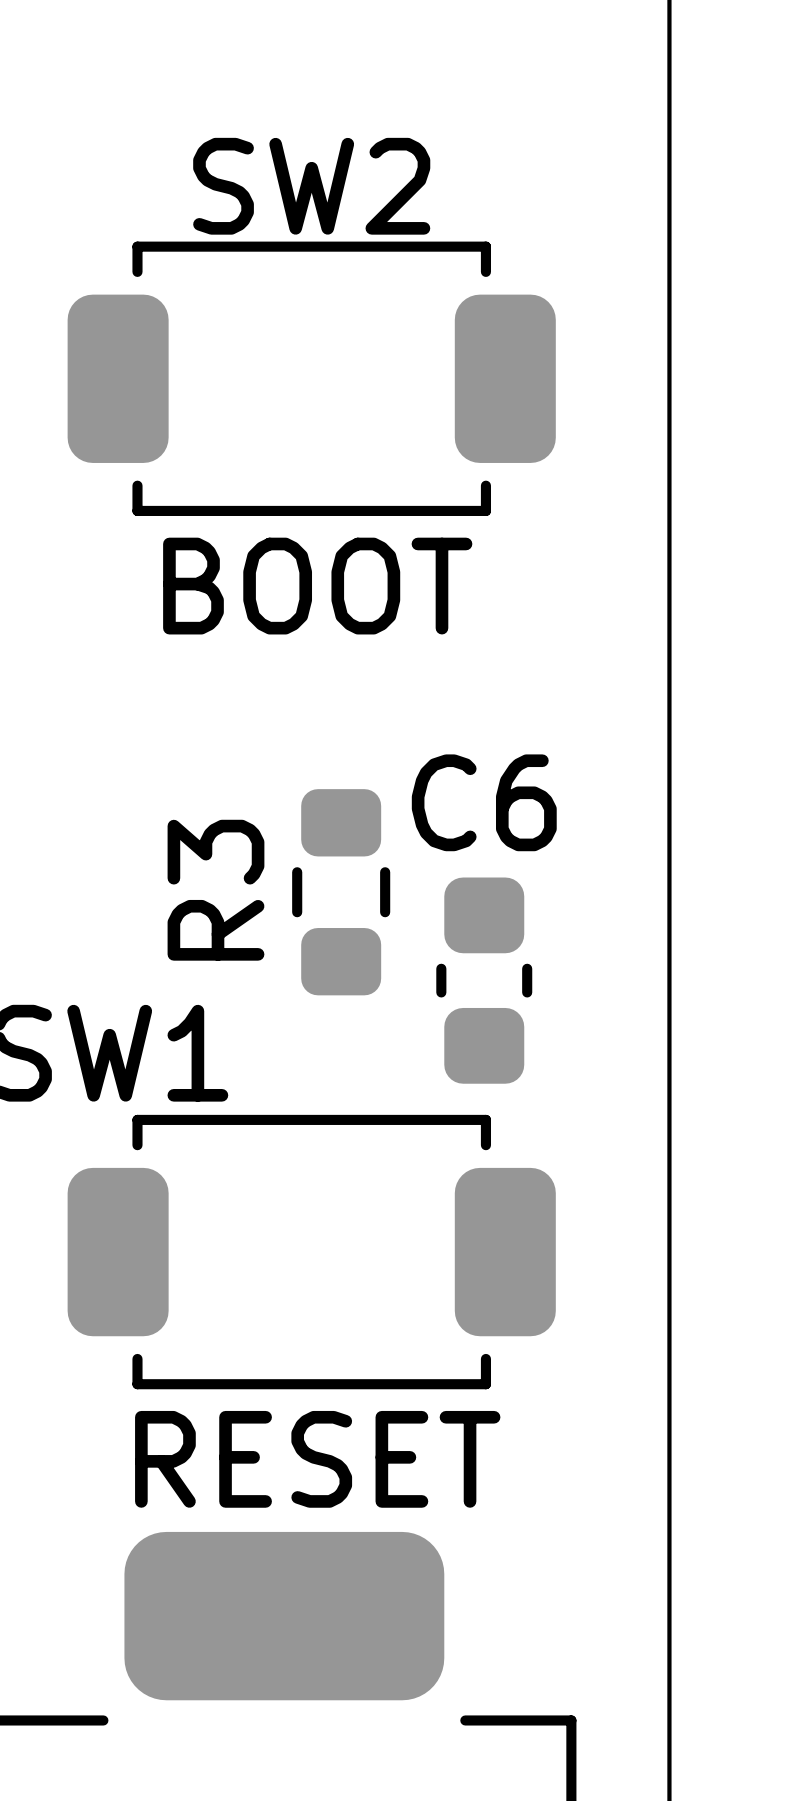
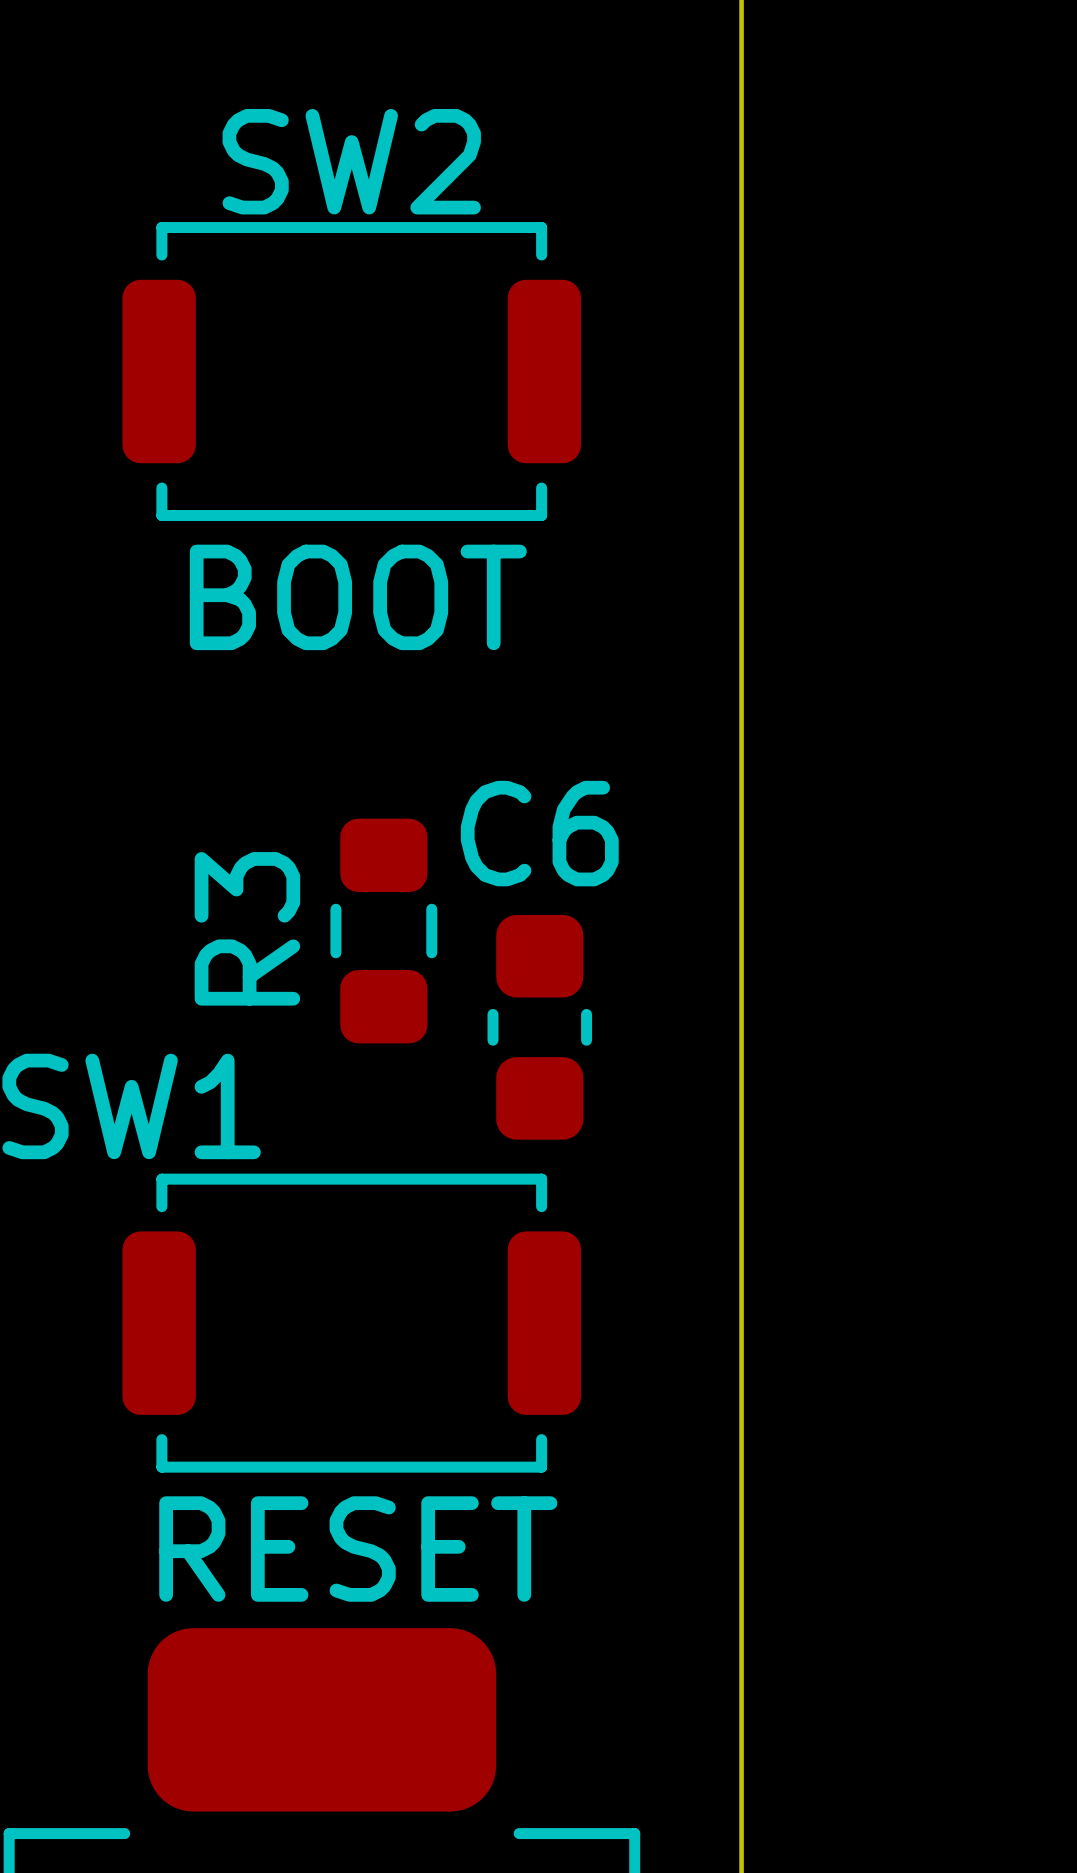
SW2 footprint: [67, 241, 556, 516] -> [122, 222, 582, 522]
SW1 footprint: [67, 1114, 556, 1390] -> [122, 1173, 582, 1473]

